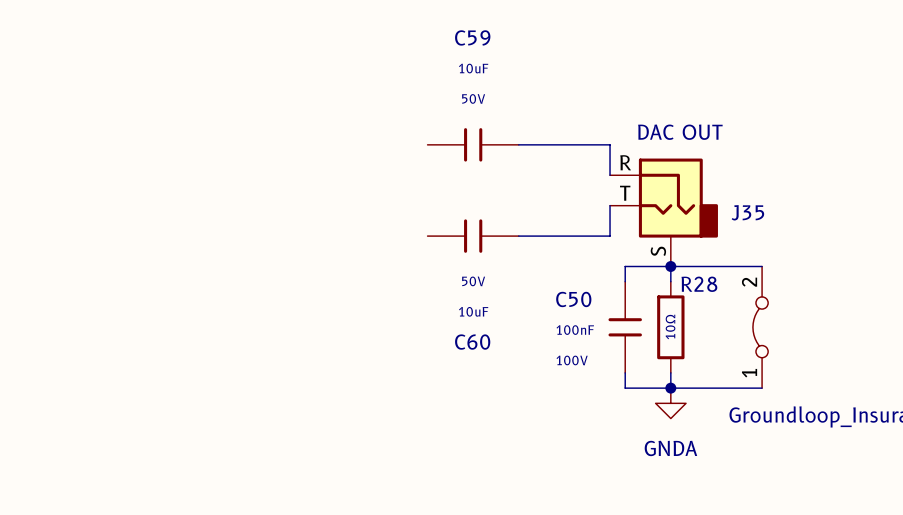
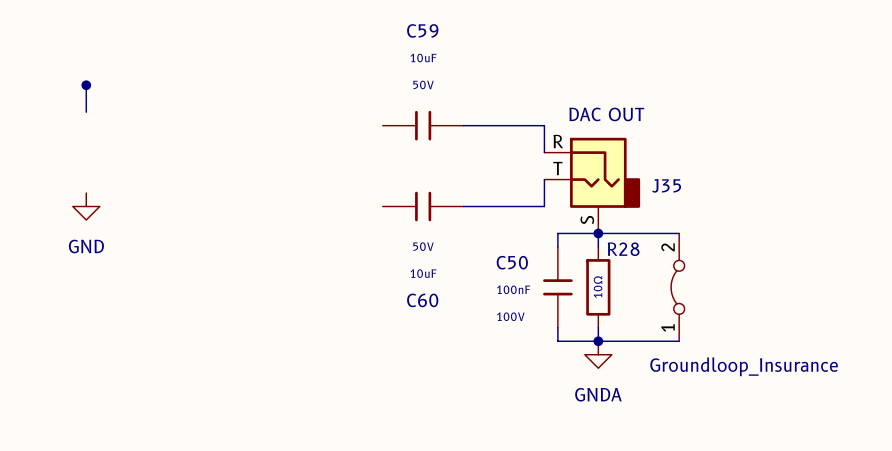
wire: none -> (86, 85) (86, 112)
junction: none -> (86, 85)
power symbol: none -> GND (86, 206)

